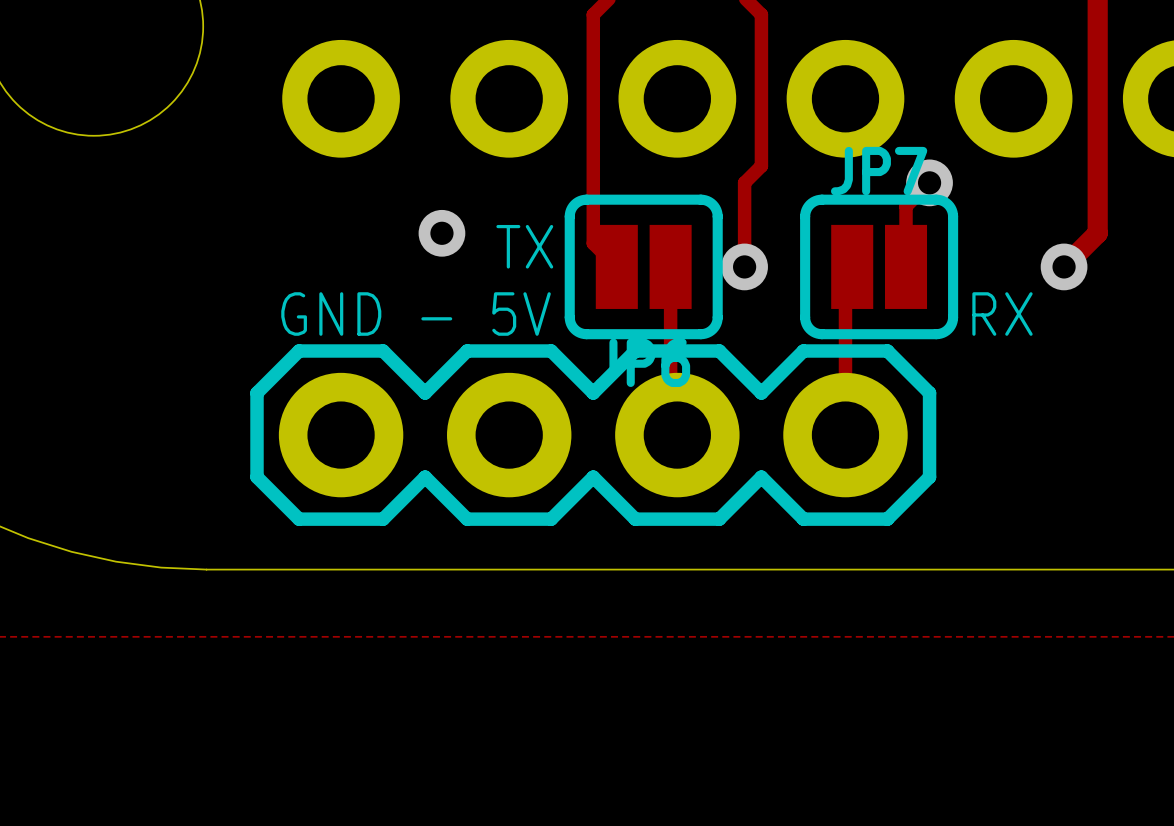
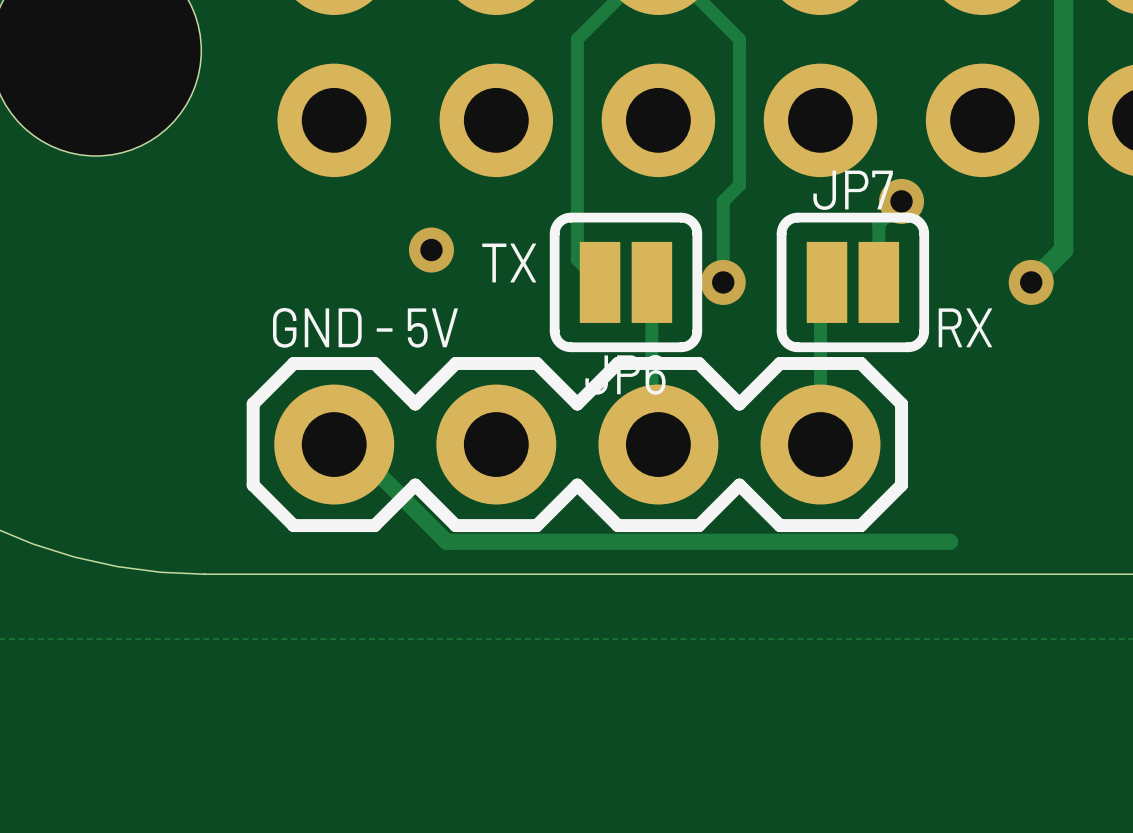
track: none -> (334, 444) (349, 444) (446, 541) (950, 541)

